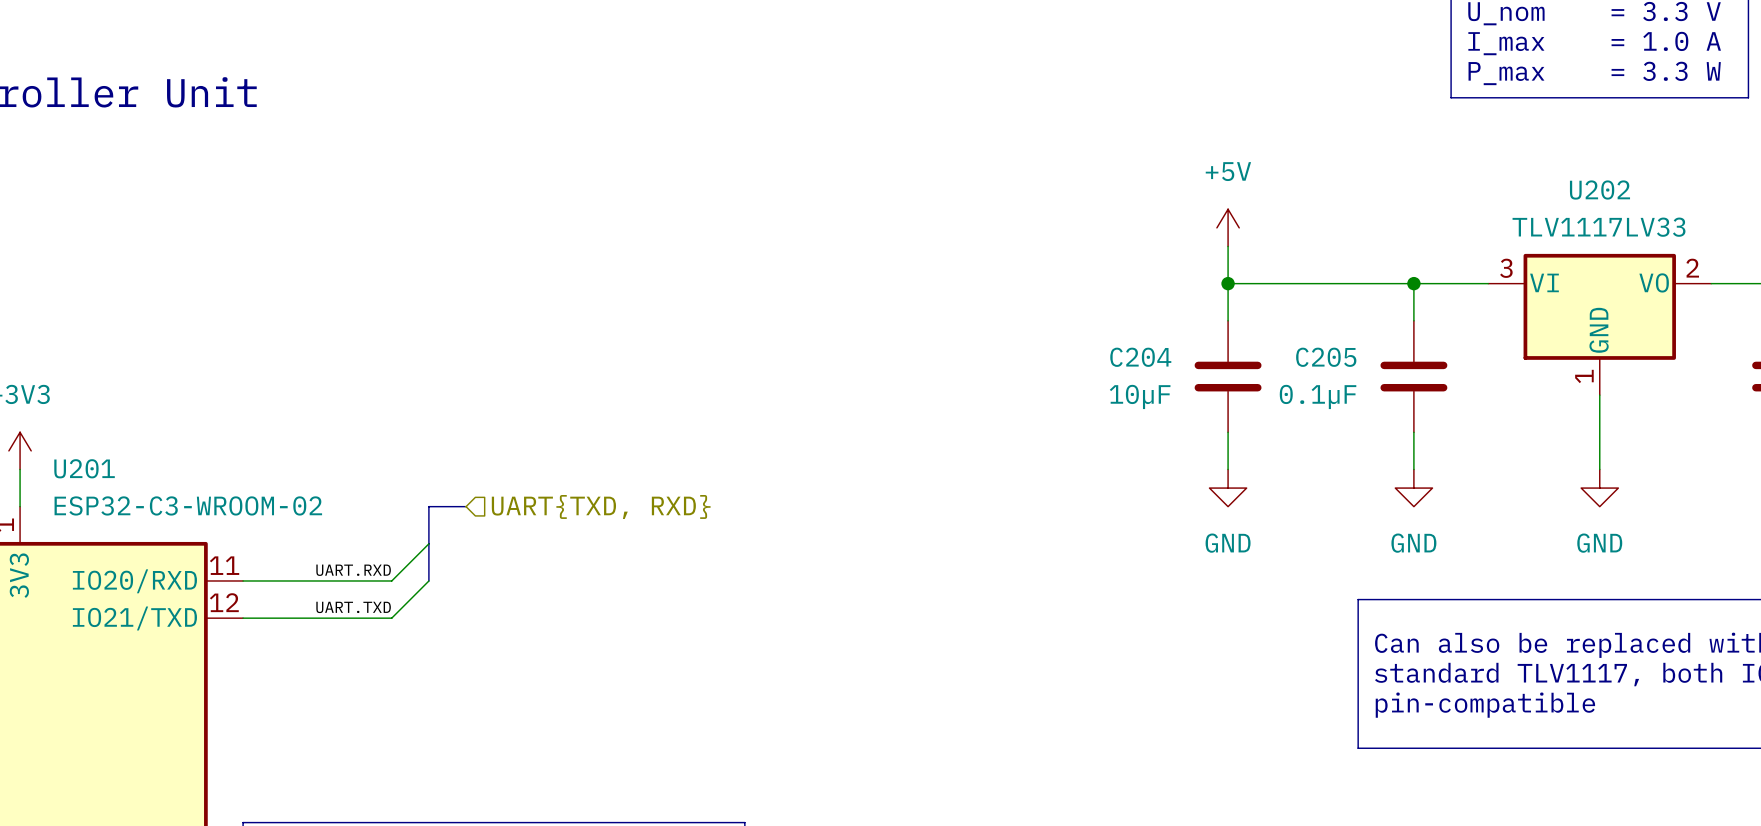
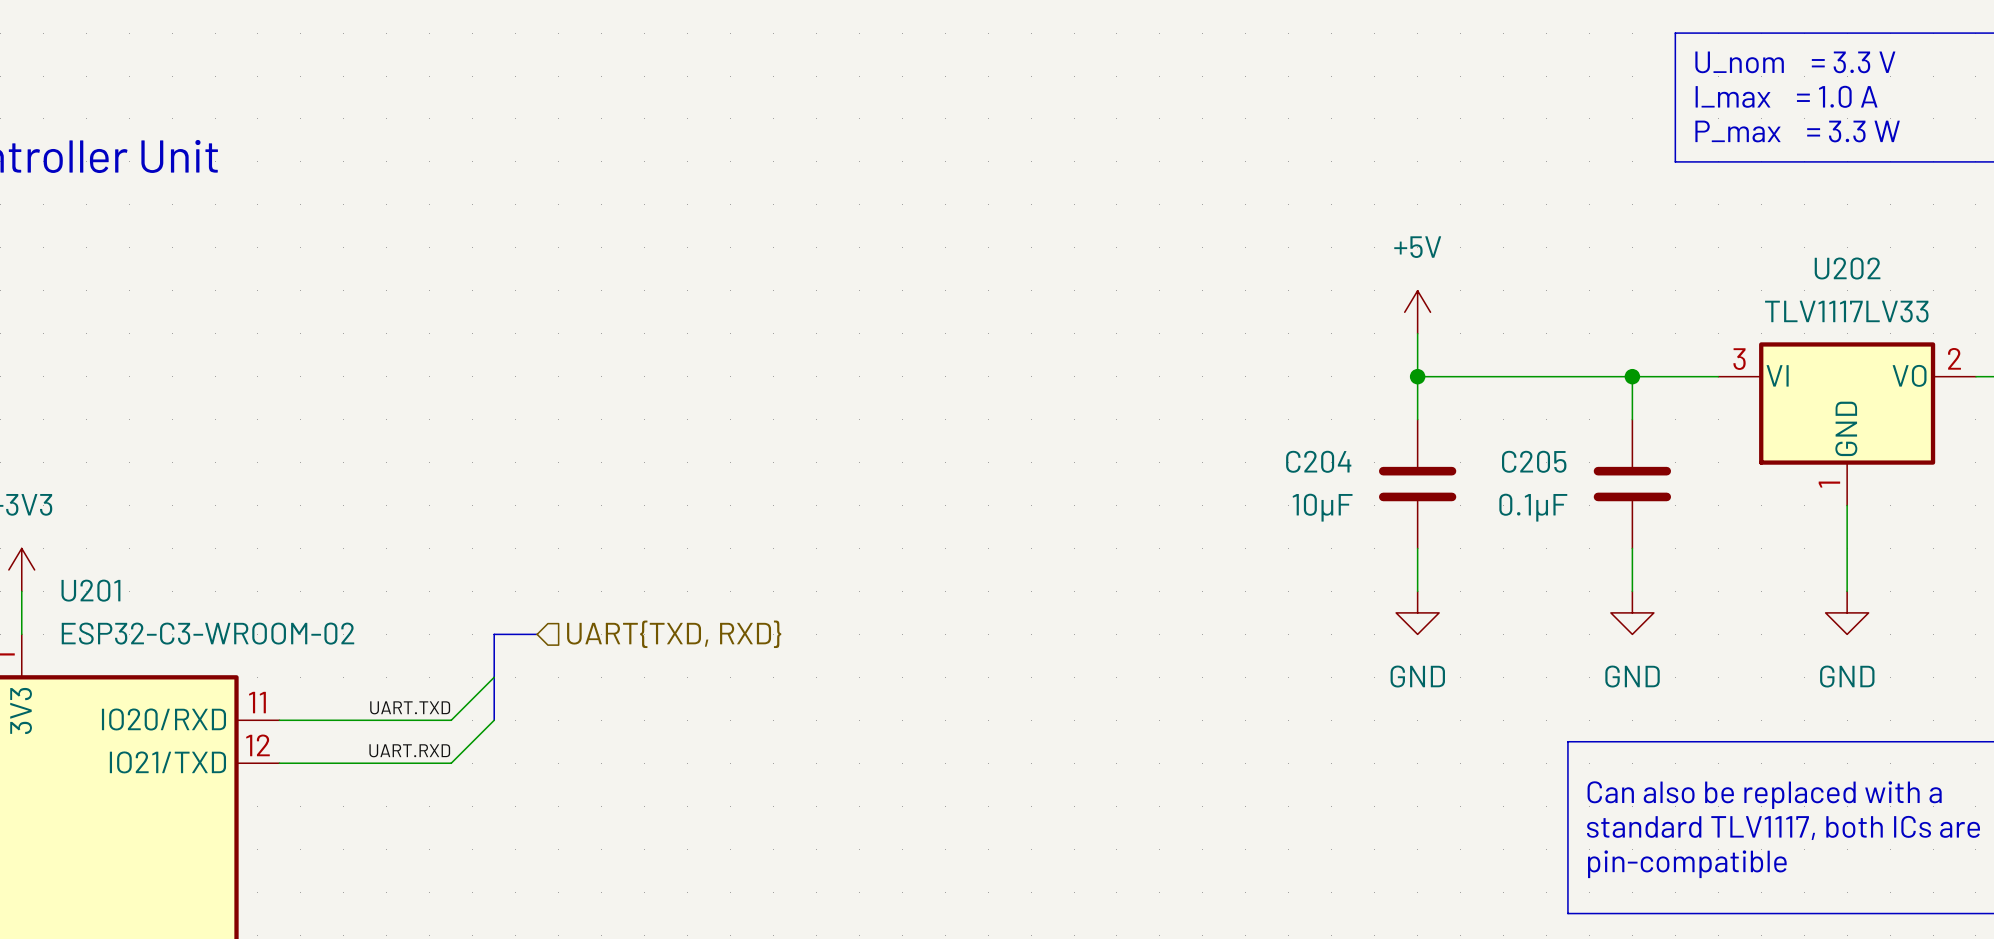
label: UART.RXD (353, 570) -> UART.TXD (410, 707)
label: UART.TXD (353, 607) -> UART.RXD (409, 750)

